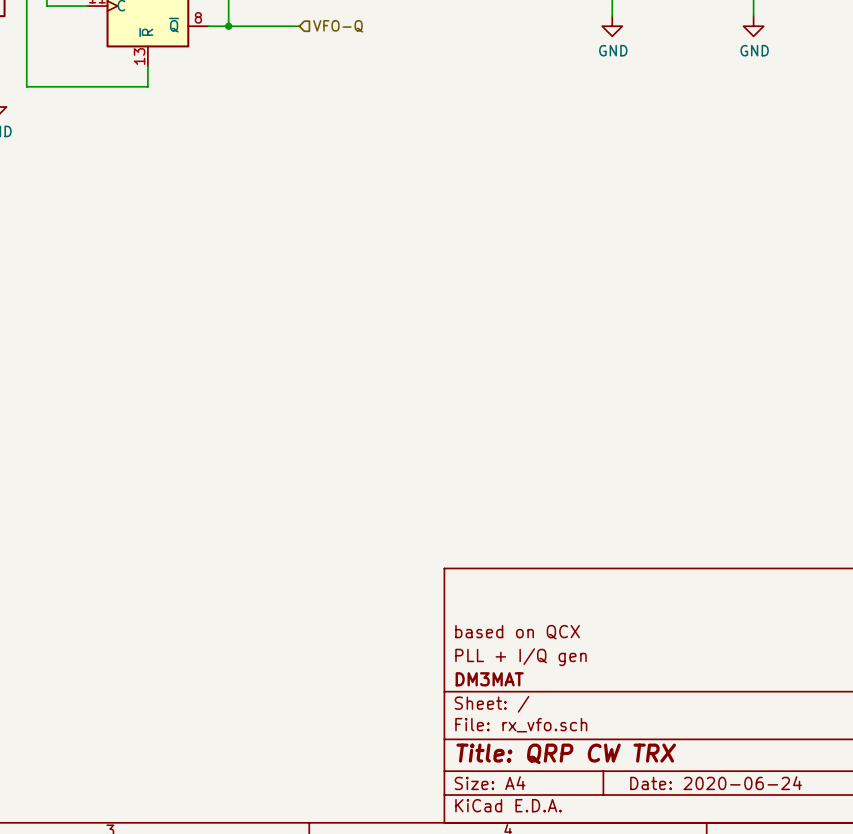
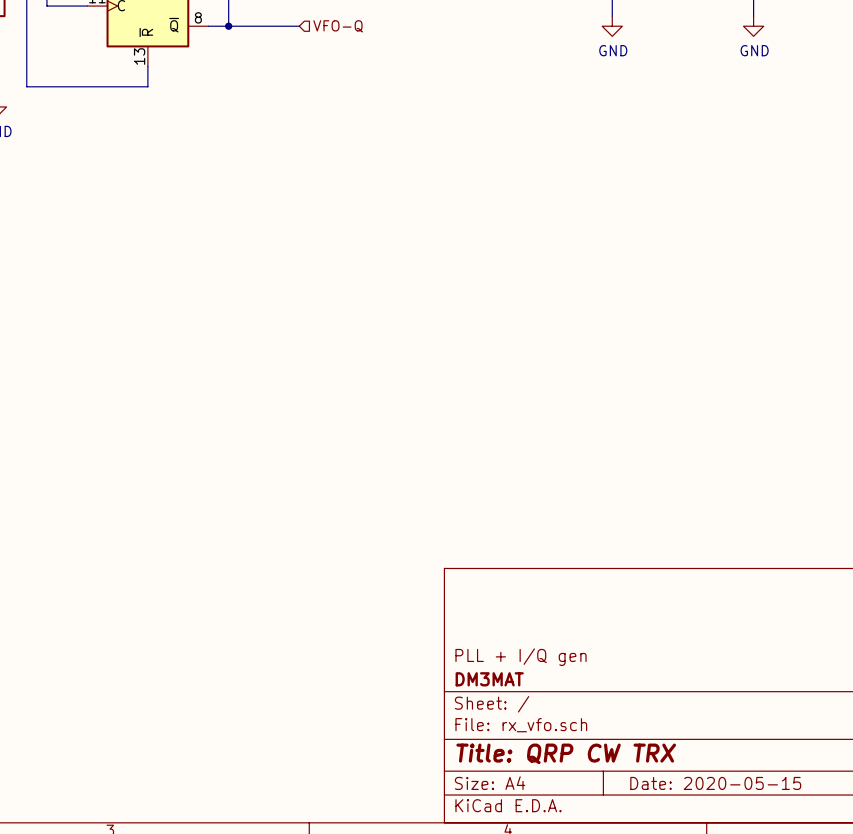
title block: based on QCX (517, 632) -> none
title block: Date: 2020-06-24 (716, 783) -> Date: 2020-05-15 (715, 783)

